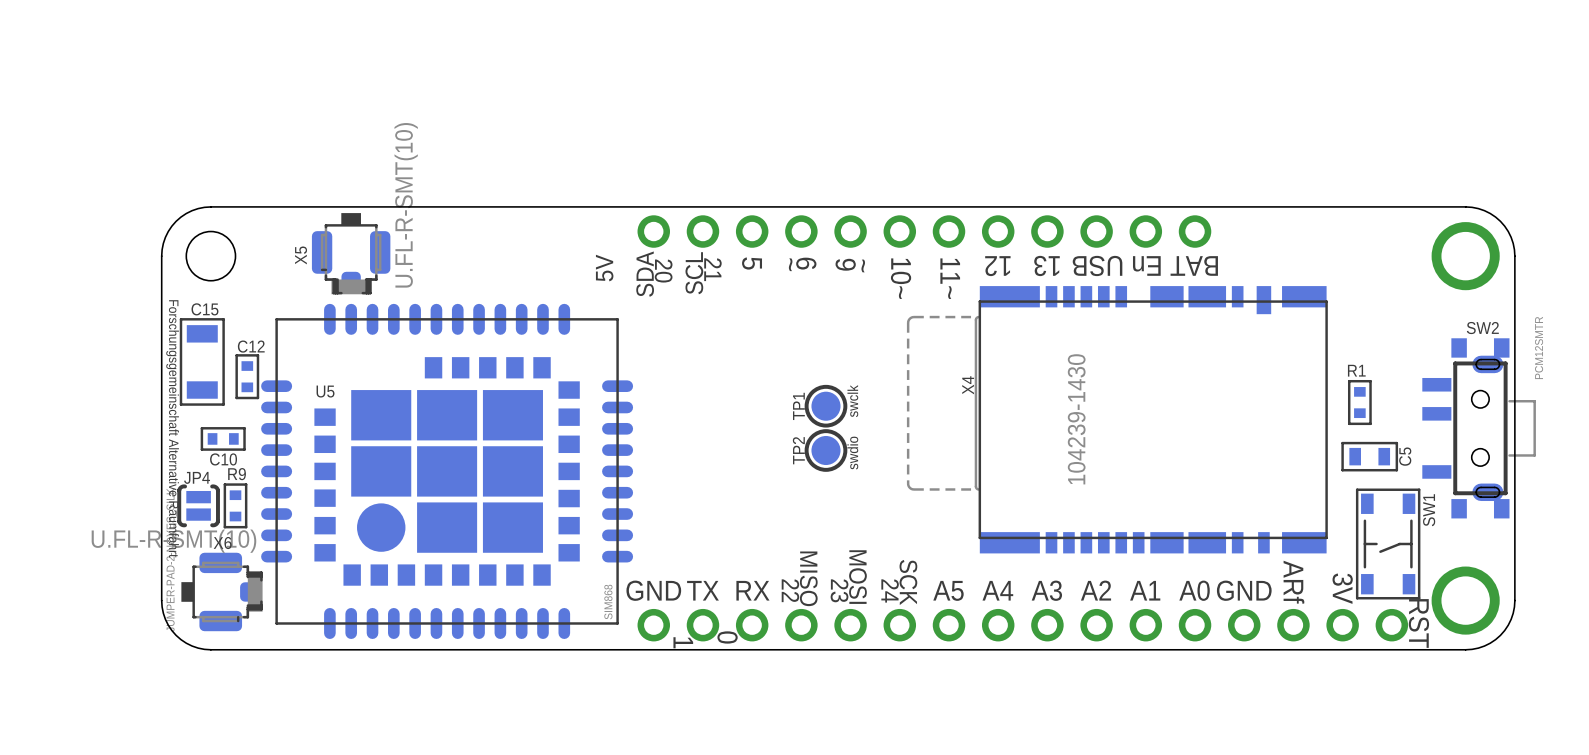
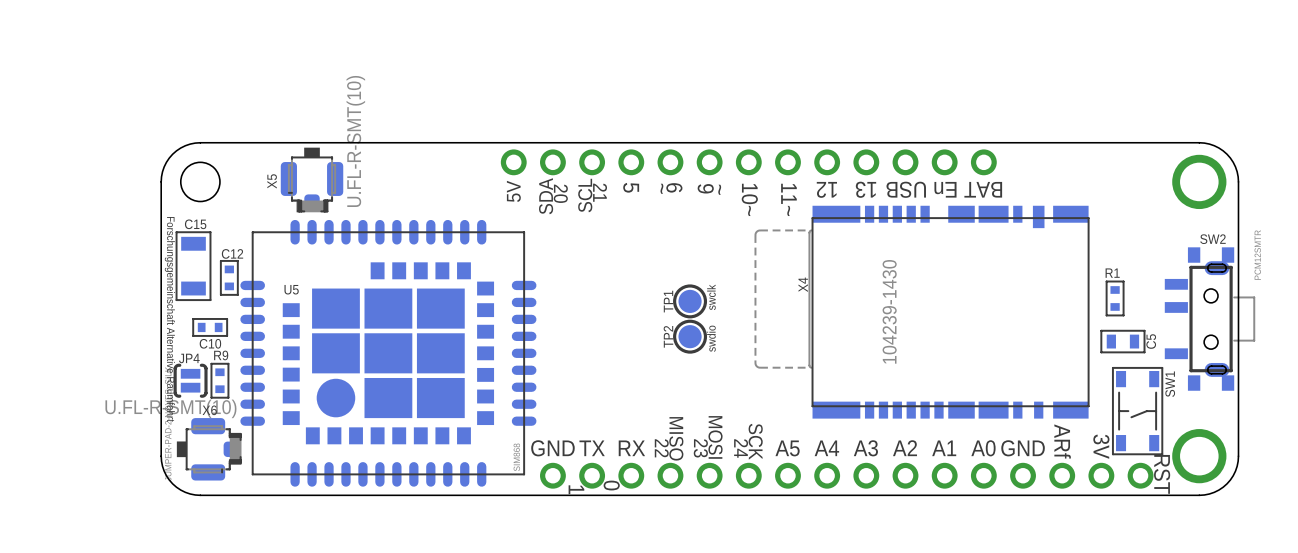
part: none -> (748, 162)

